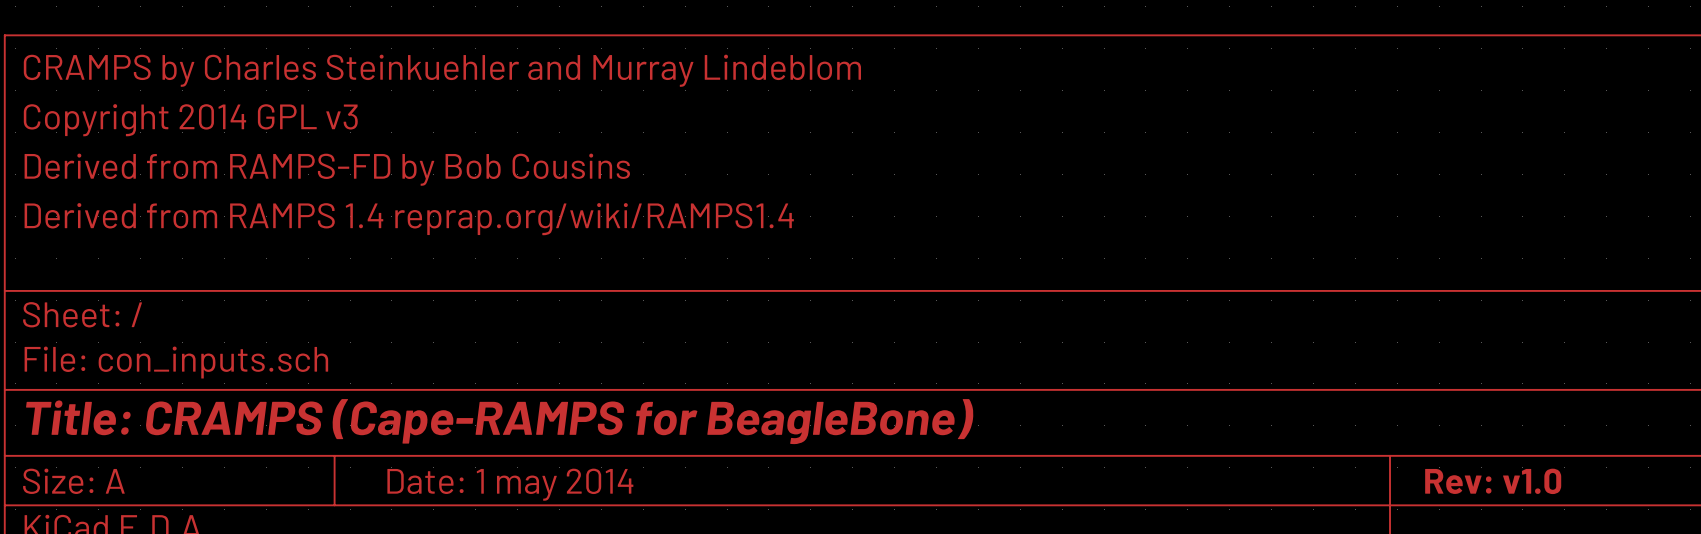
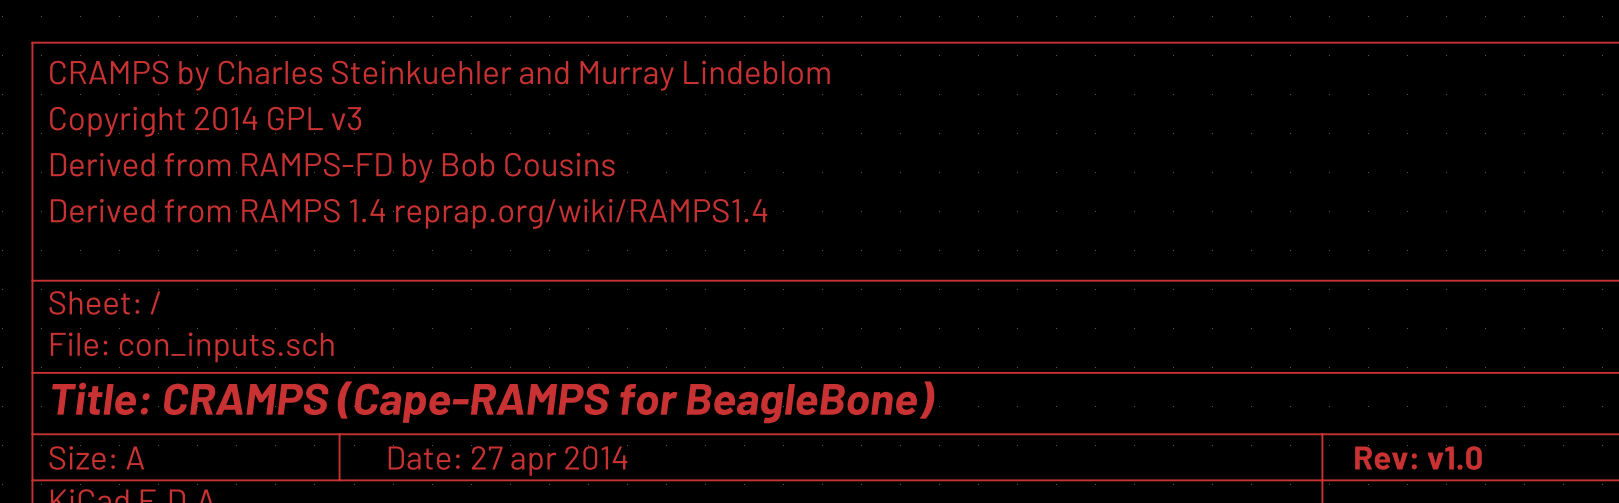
title block: Date: 1 may 2014 (510, 484) -> Date: 27 apr 2014 (507, 461)

